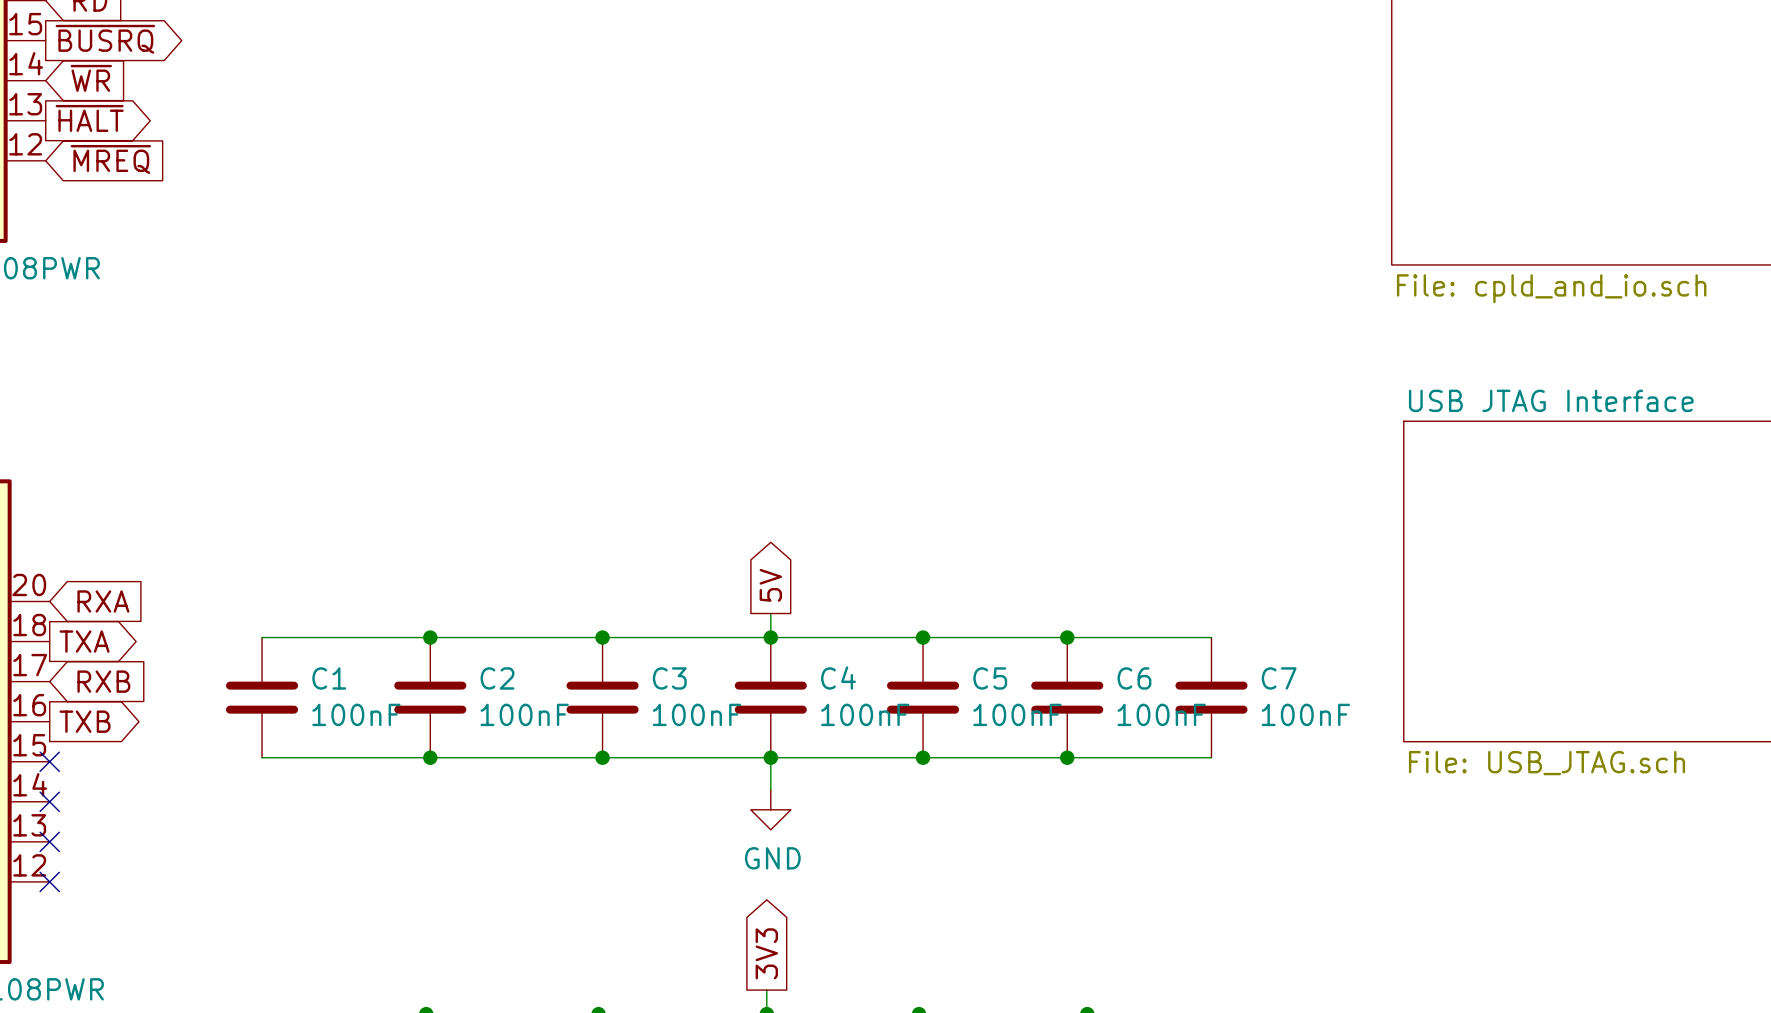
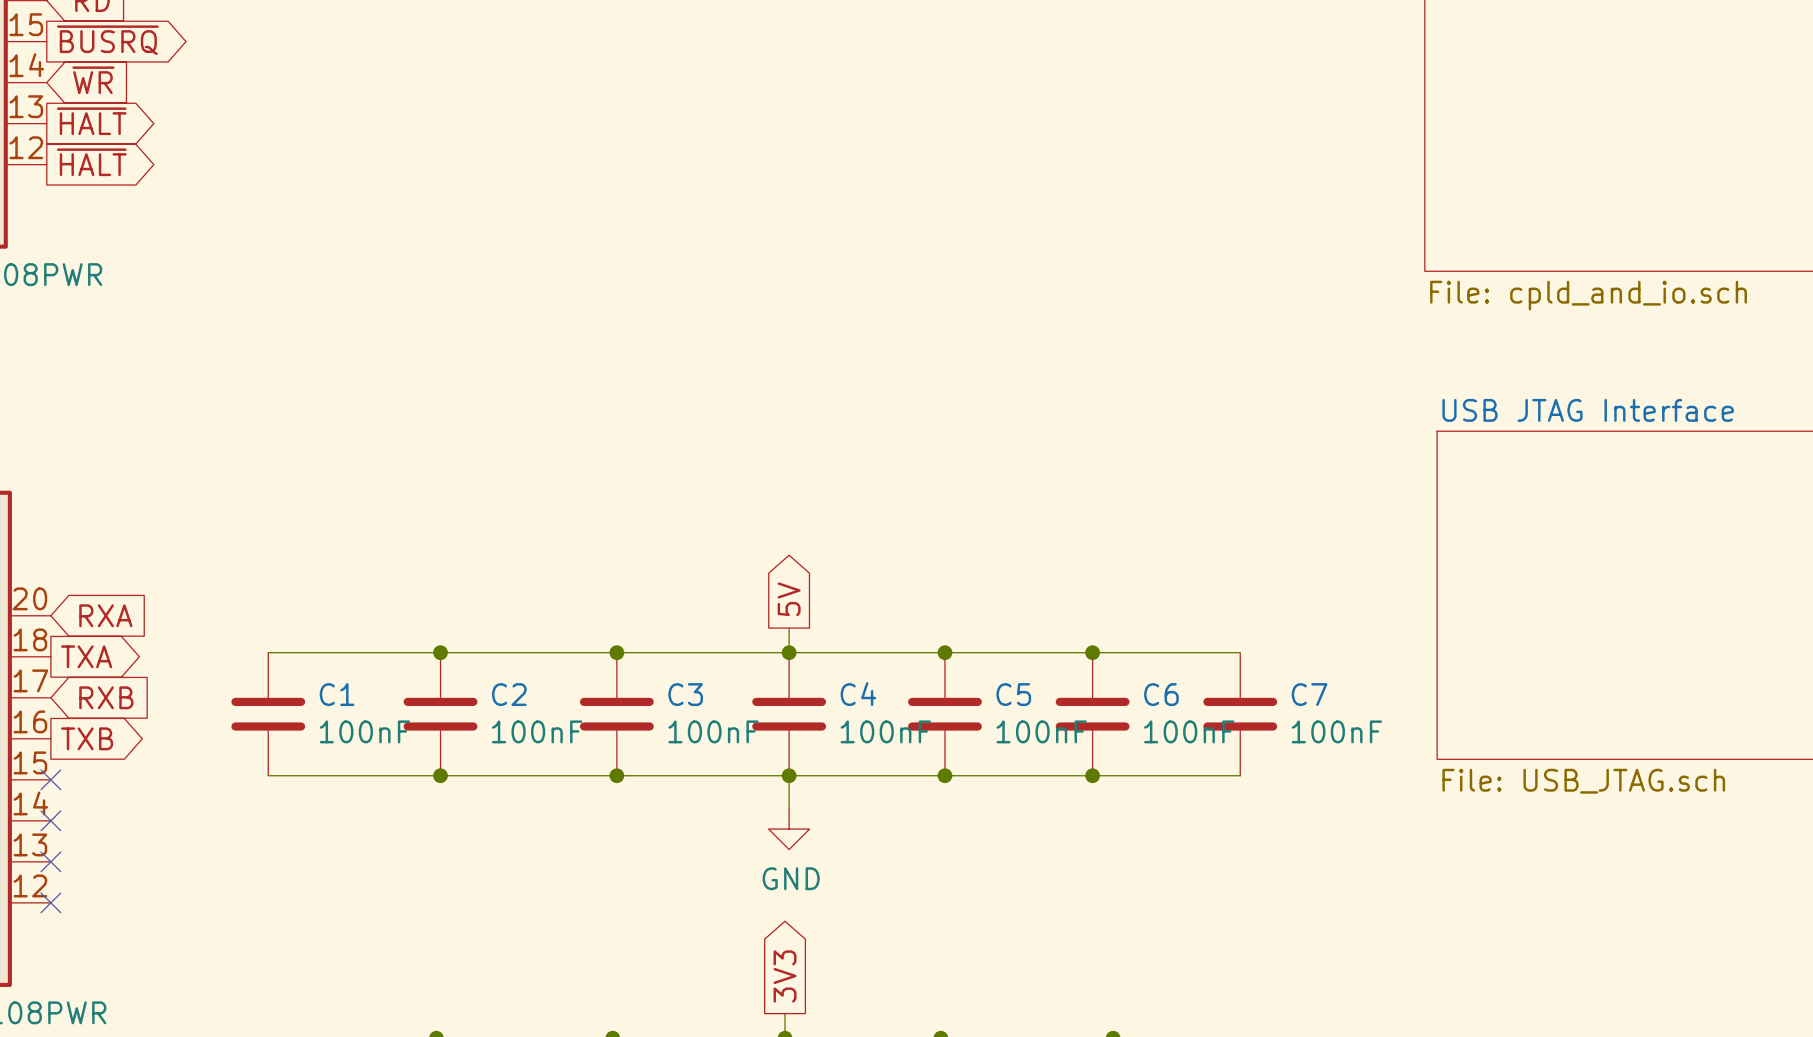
global label shape: input (110, 159) -> output (91, 162)
global label: ~{MREQ} (110, 159) -> ~{HALT} (91, 162)

